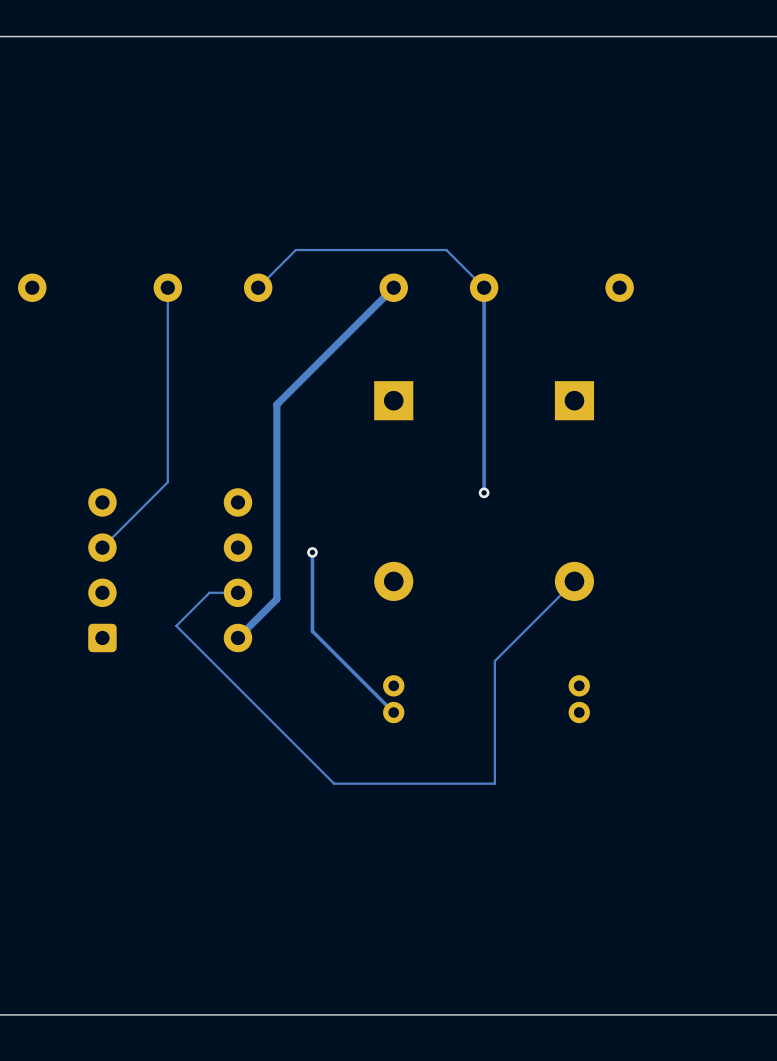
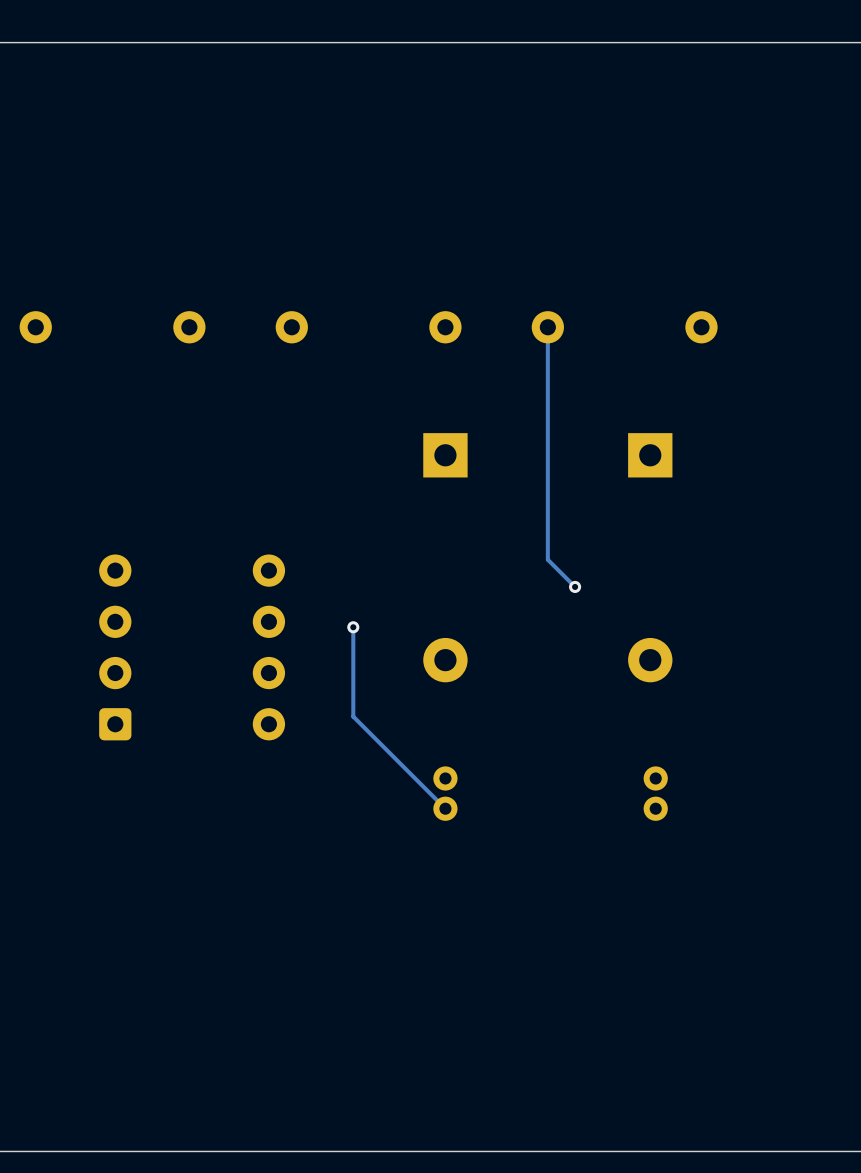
track: (167, 287) (167, 482) (102, 547) -> none
track: (393, 287) (276, 404) (276, 599) (238, 637) -> none
track: (484, 287) (446, 250) (295, 250) (258, 287) -> none
track: none -> (547, 559) (575, 586)
via position: (484, 492) -> (575, 586)
track: (574, 581) (494, 661) (494, 783) (334, 783) (176, 625) (209, 592) (238, 592) -> none

